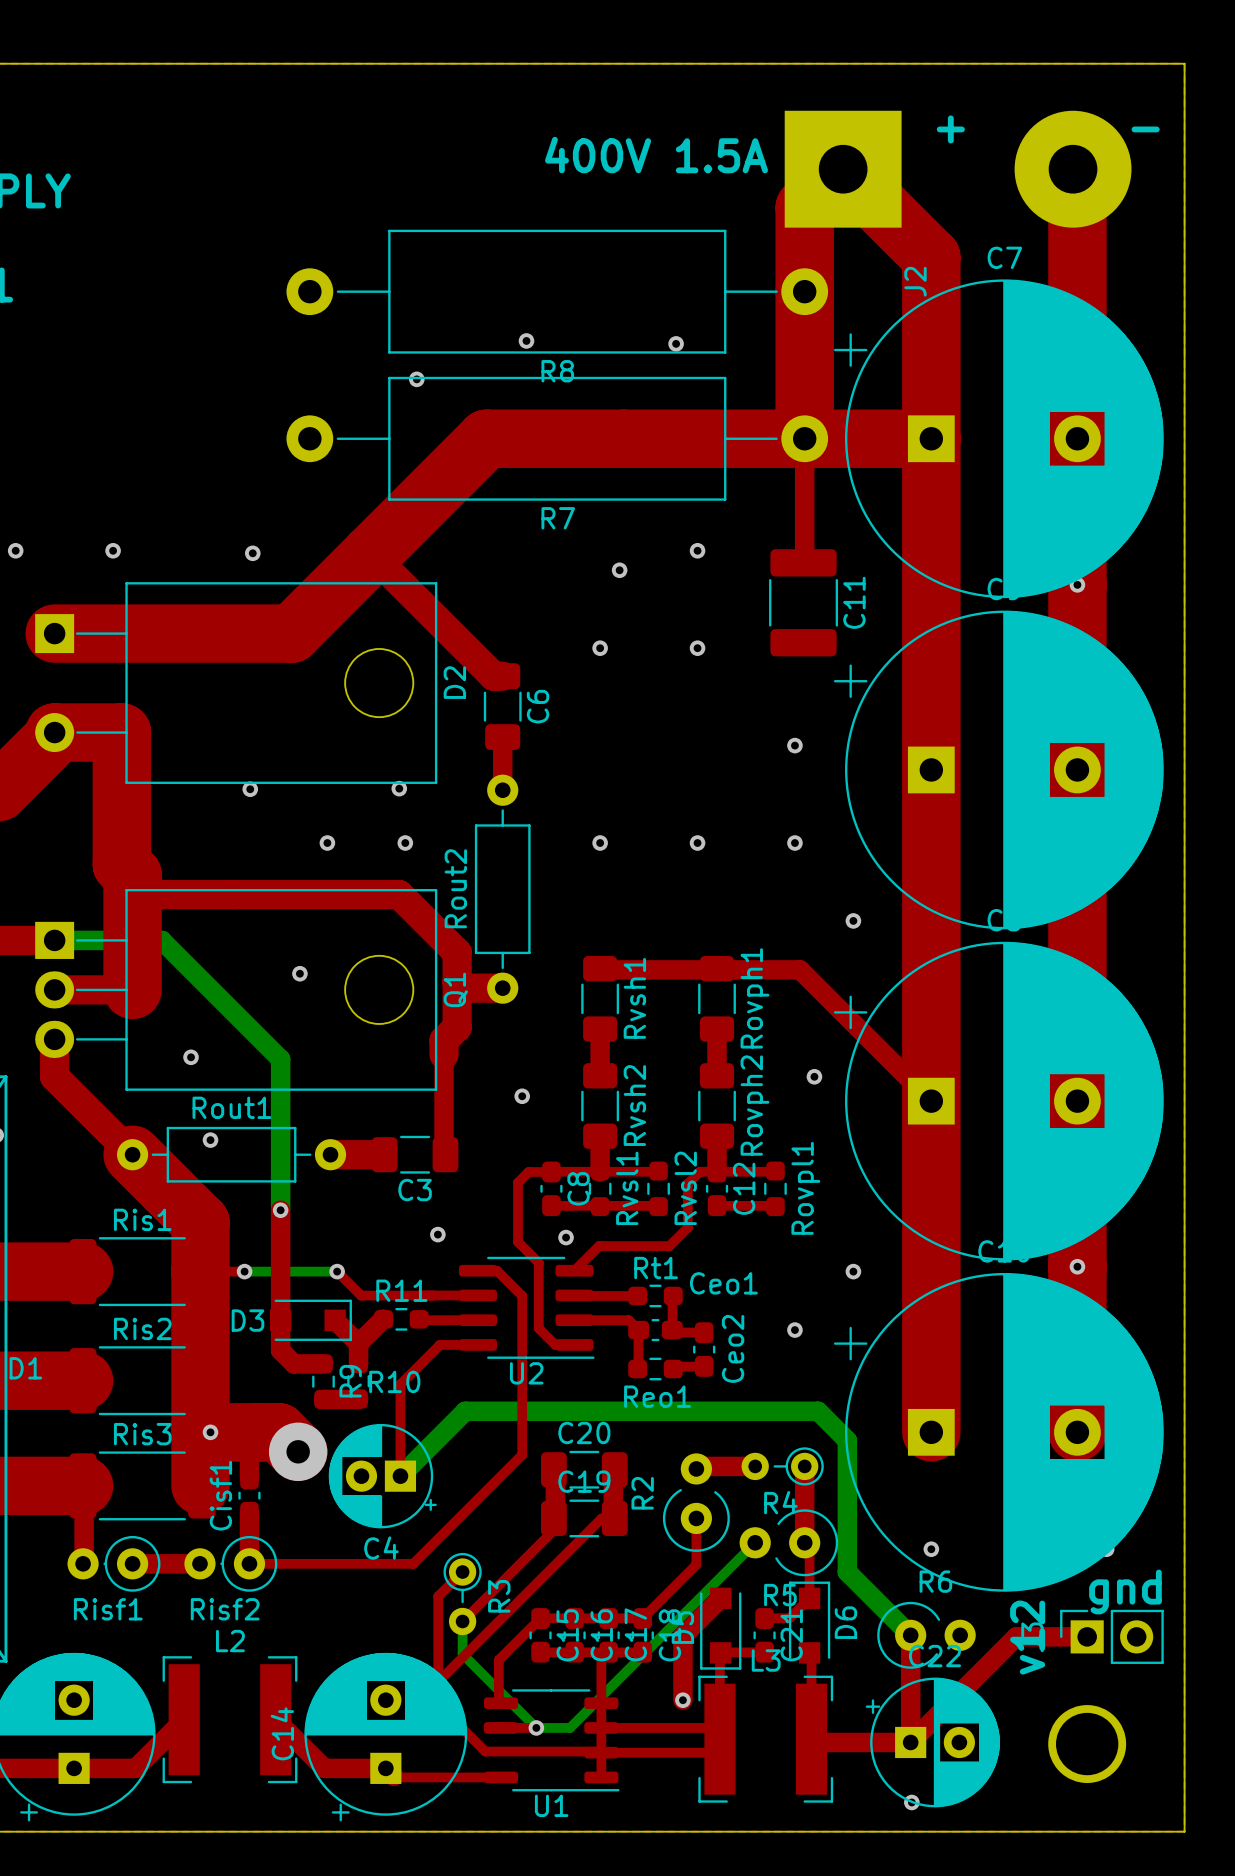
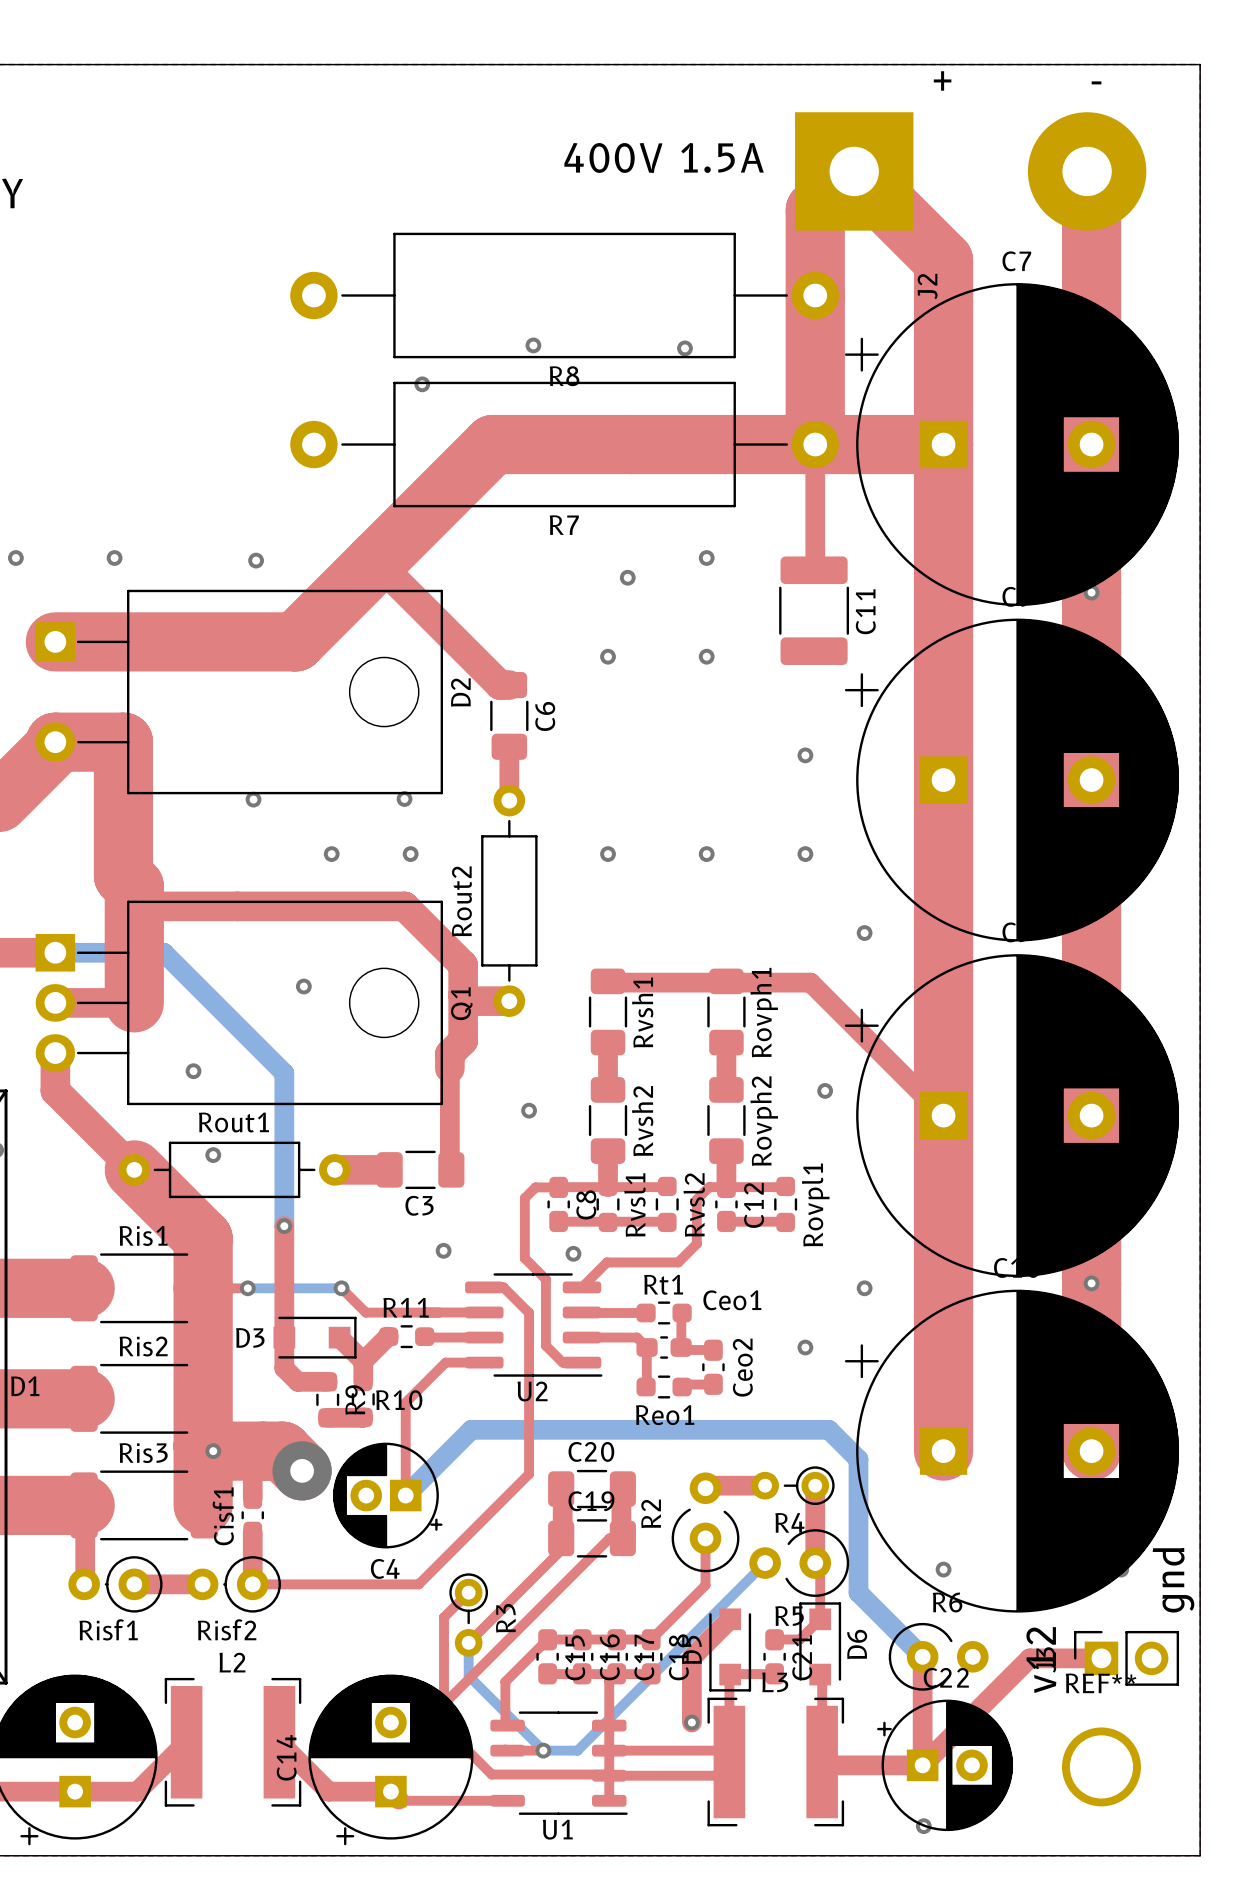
text position: + (950, 129) -> + (942, 80)
text position: - (1145, 129) -> - (1096, 82)
text rotation: 0° (1125, 1591) -> 90° counterclockwise (1173, 1580)
REF** name: none -> REF** (1101, 1683)

